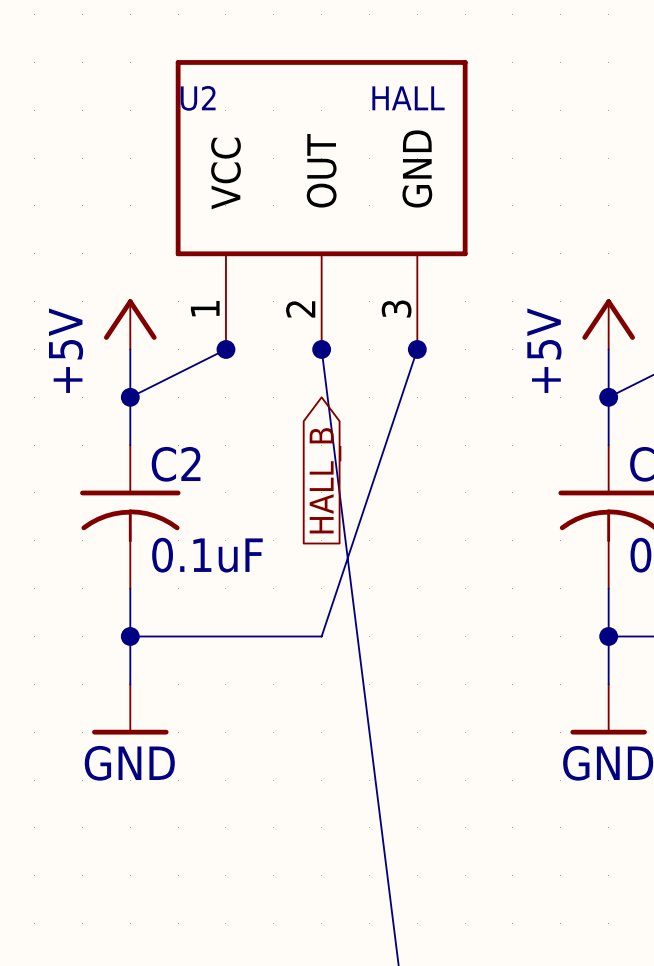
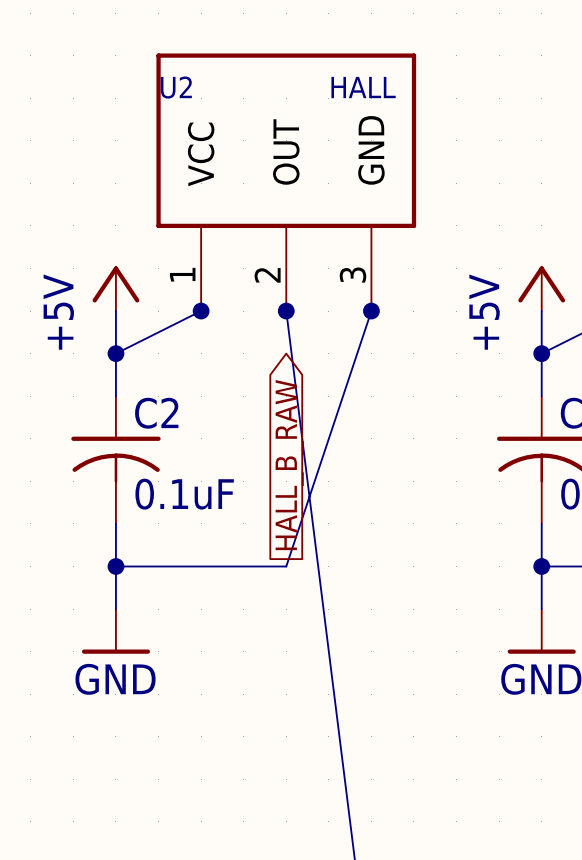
global label: HALL_B (325, 480) -> HALL_B_RAW (289, 465)

